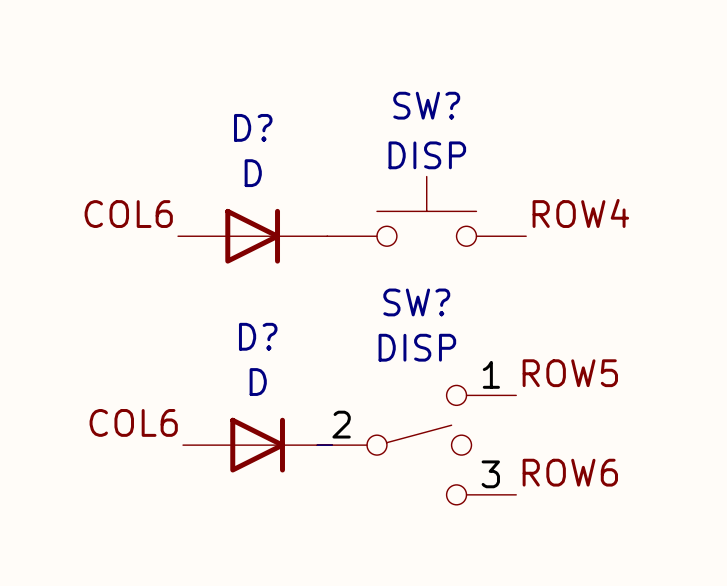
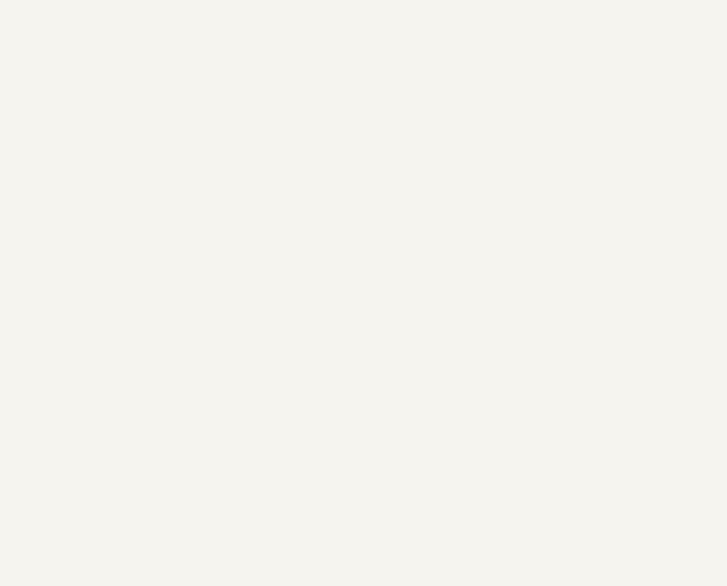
SW?: DISP (426, 211) -> none
label: ROW4 (580, 213) -> none
label: COL6 (128, 214) -> none
D?: D (252, 236) -> none
label: ROW5 (570, 373) -> none
label: COL6 (133, 422) -> none
D?: D (257, 445) -> none
wire: (317, 445) (332, 445) -> none
SW?: DISP (416, 445) -> none
label: ROW6 (570, 472) -> none

